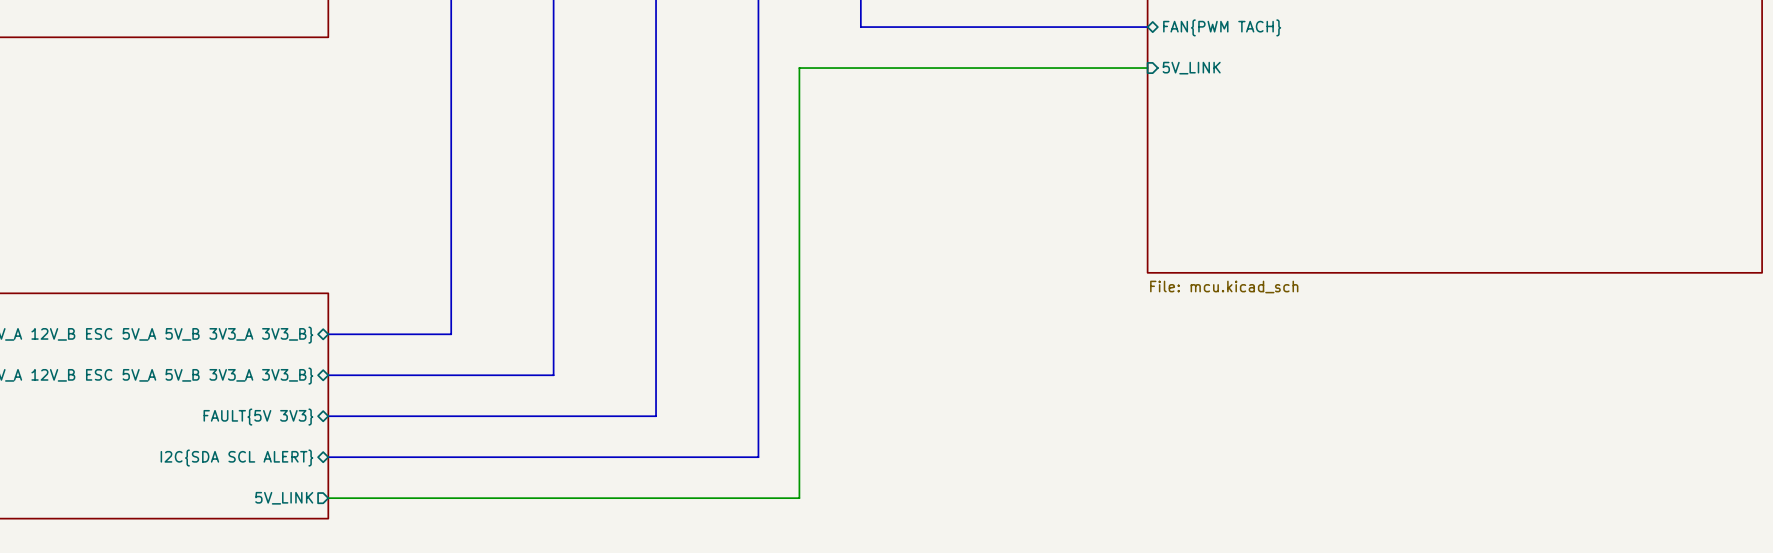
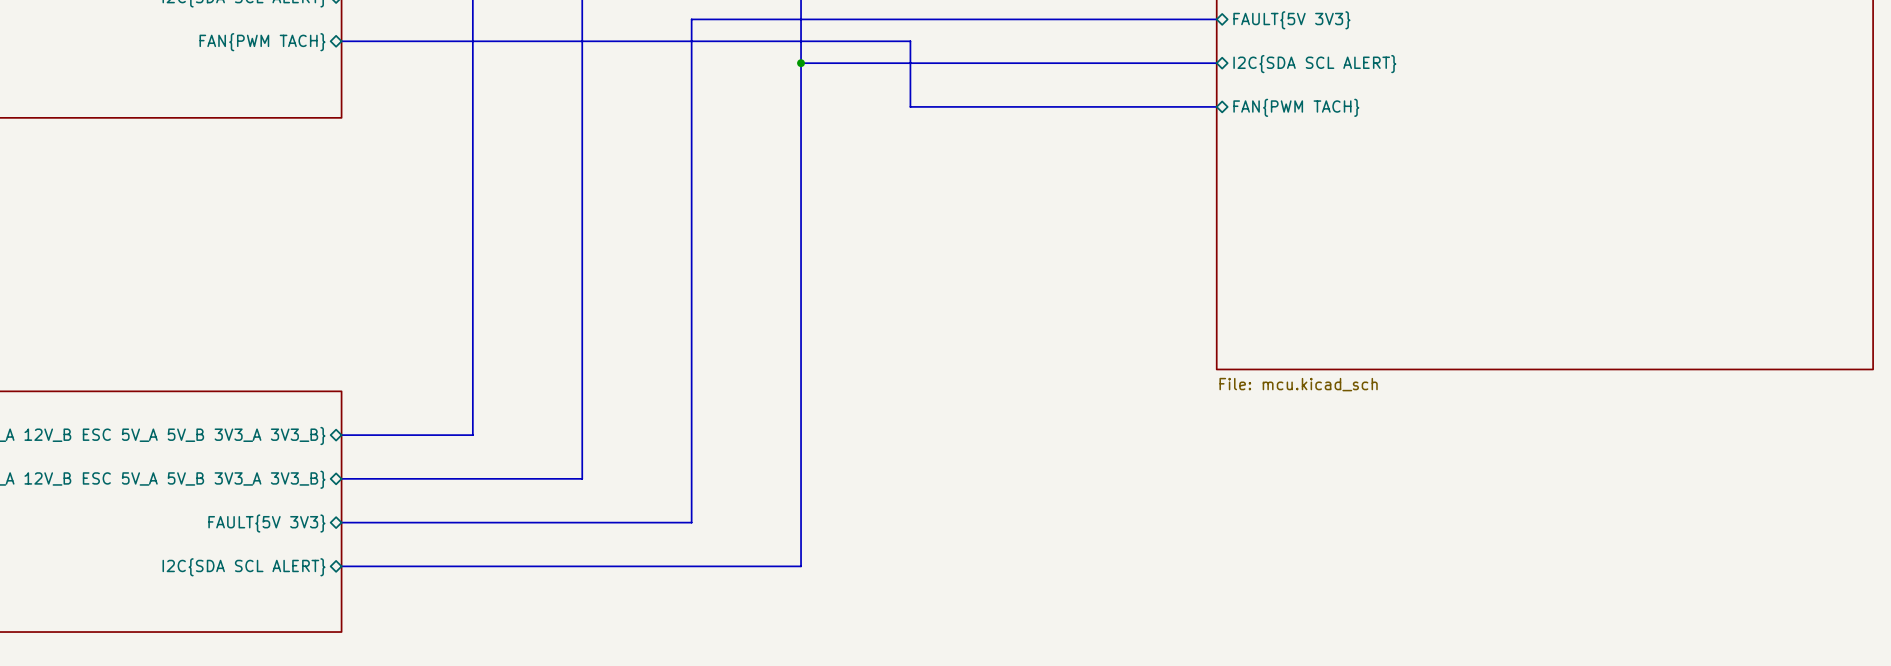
wire: (1147, 68) (799, 68) (799, 498) (328, 498) -> none
sheet pin: 5V_LINK (1191, 68) -> none
sheet pin: 5V_LINK (284, 498) -> none

